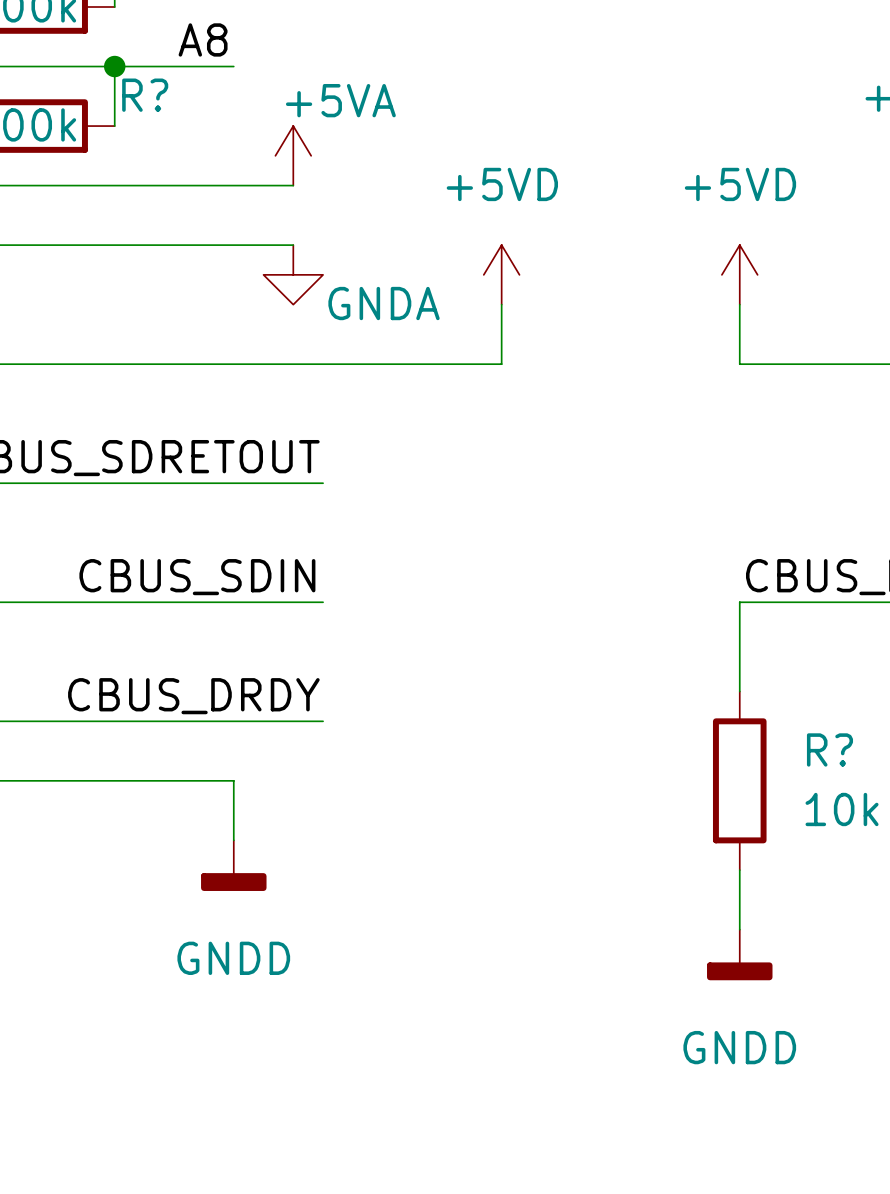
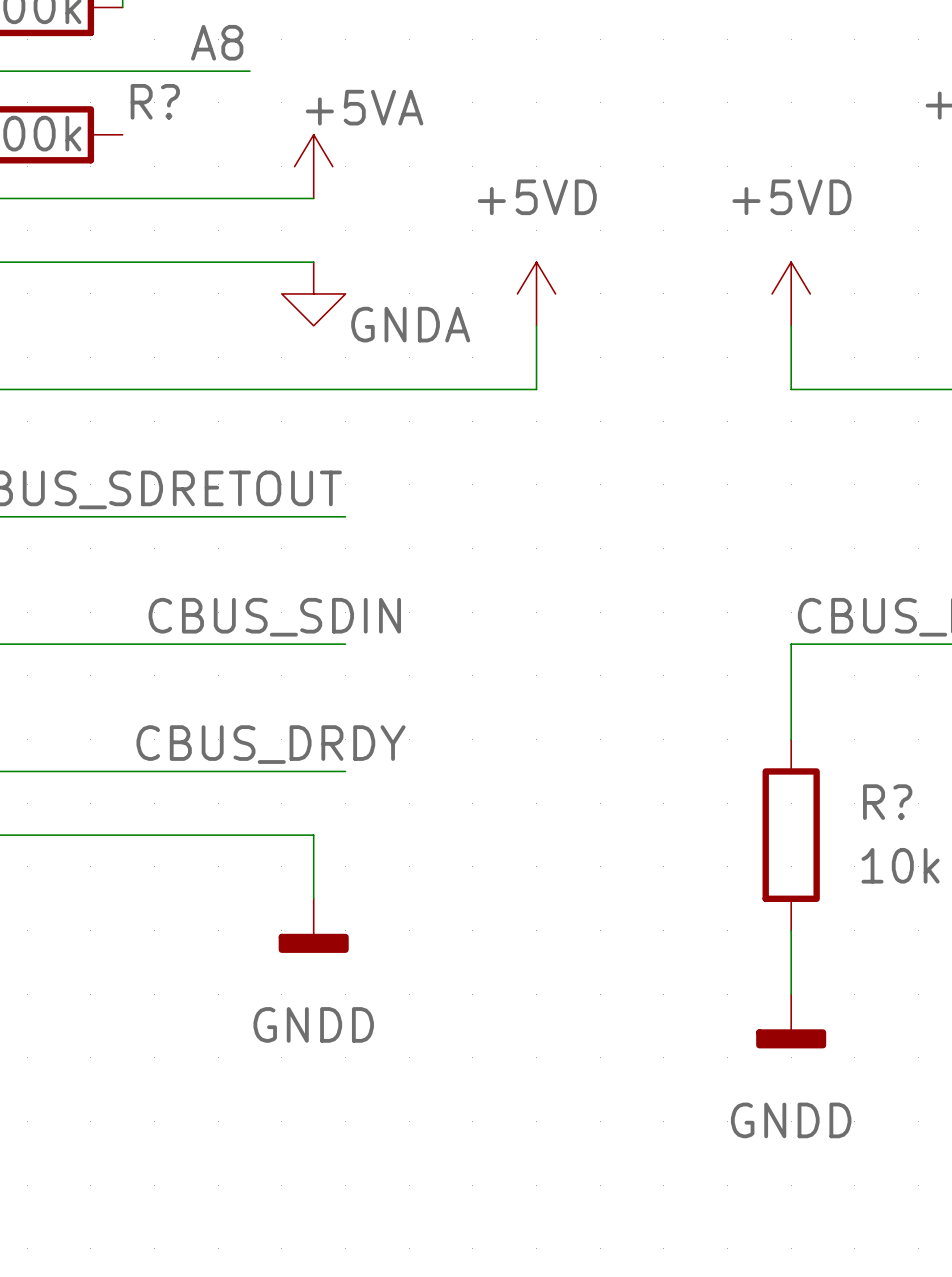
wire: (114, 66) (114, 126) -> none
junction: (114, 66) -> none
label position: CBUS_SDIN (197, 577) -> CBUS_SDIN (274, 617)
label position: CBUS_DRDY (193, 696) -> CBUS_DRDY (271, 744)
wire: (233, 780) (233, 840) -> (250, 835) (313, 835) (313, 898)
power symbol position: GNDD (233, 865) -> GNDD (313, 925)

